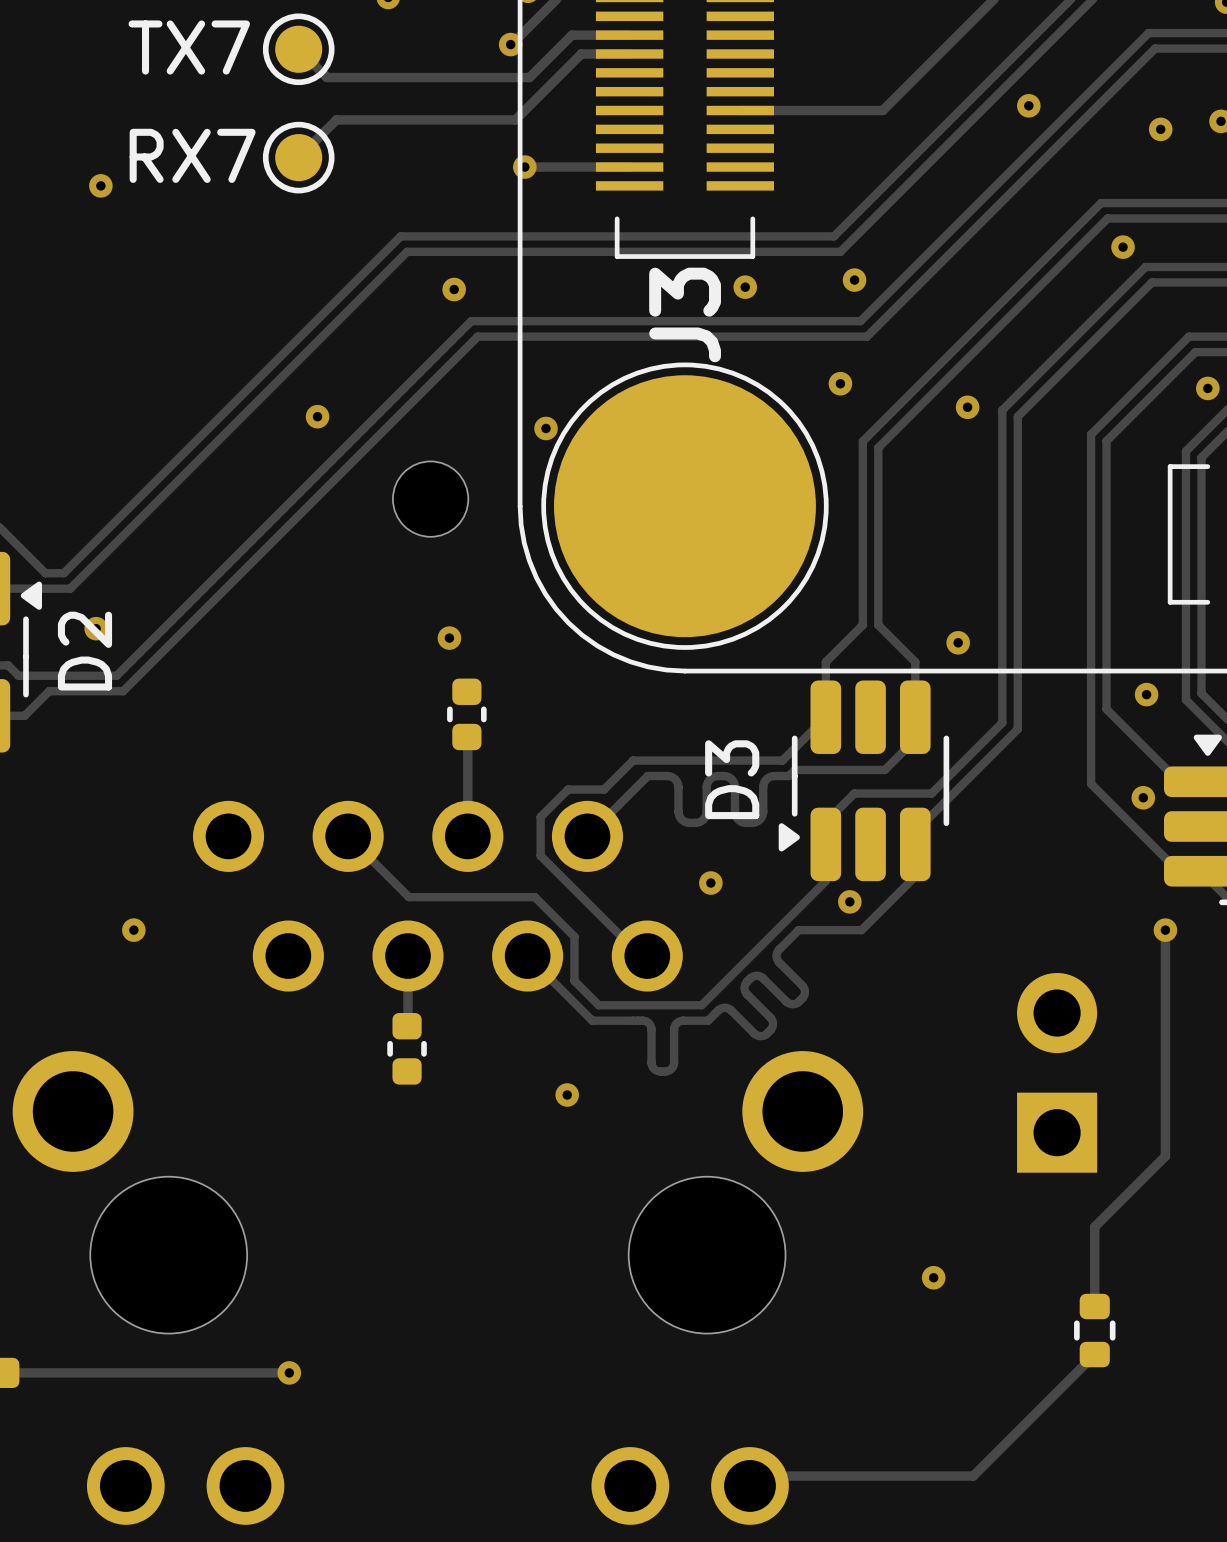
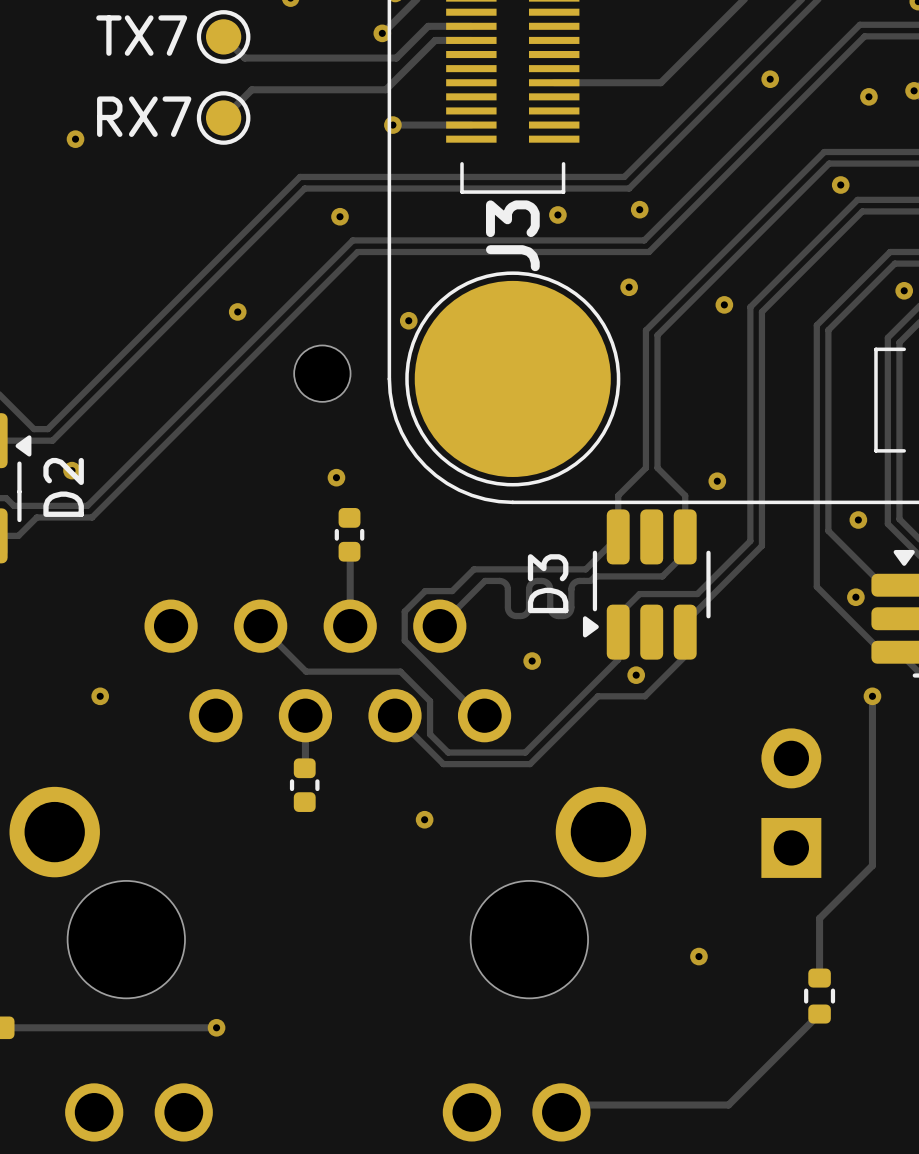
track: (779, 949) (776, 955) (777, 960) (804, 988) (804, 995) (799, 1001) (793, 1004) (789, 1003) (761, 976) (755, 975) (750, 978) -> (583, 710) (561, 732)
track: (747, 981) (744, 987) (745, 992) (772, 1020) (772, 1027) (767, 1033) (761, 1036) (757, 1035) (729, 1008) (723, 1007) (718, 1010) -> (559, 734) (537, 756)
track: (642, 1020) (648, 1022) (651, 1027) (652, 1065) (655, 1070) (660, 1071) (668, 1071) (673, 1066) (674, 1027) (677, 1022) (683, 1020) -> (480, 764) (511, 764)

